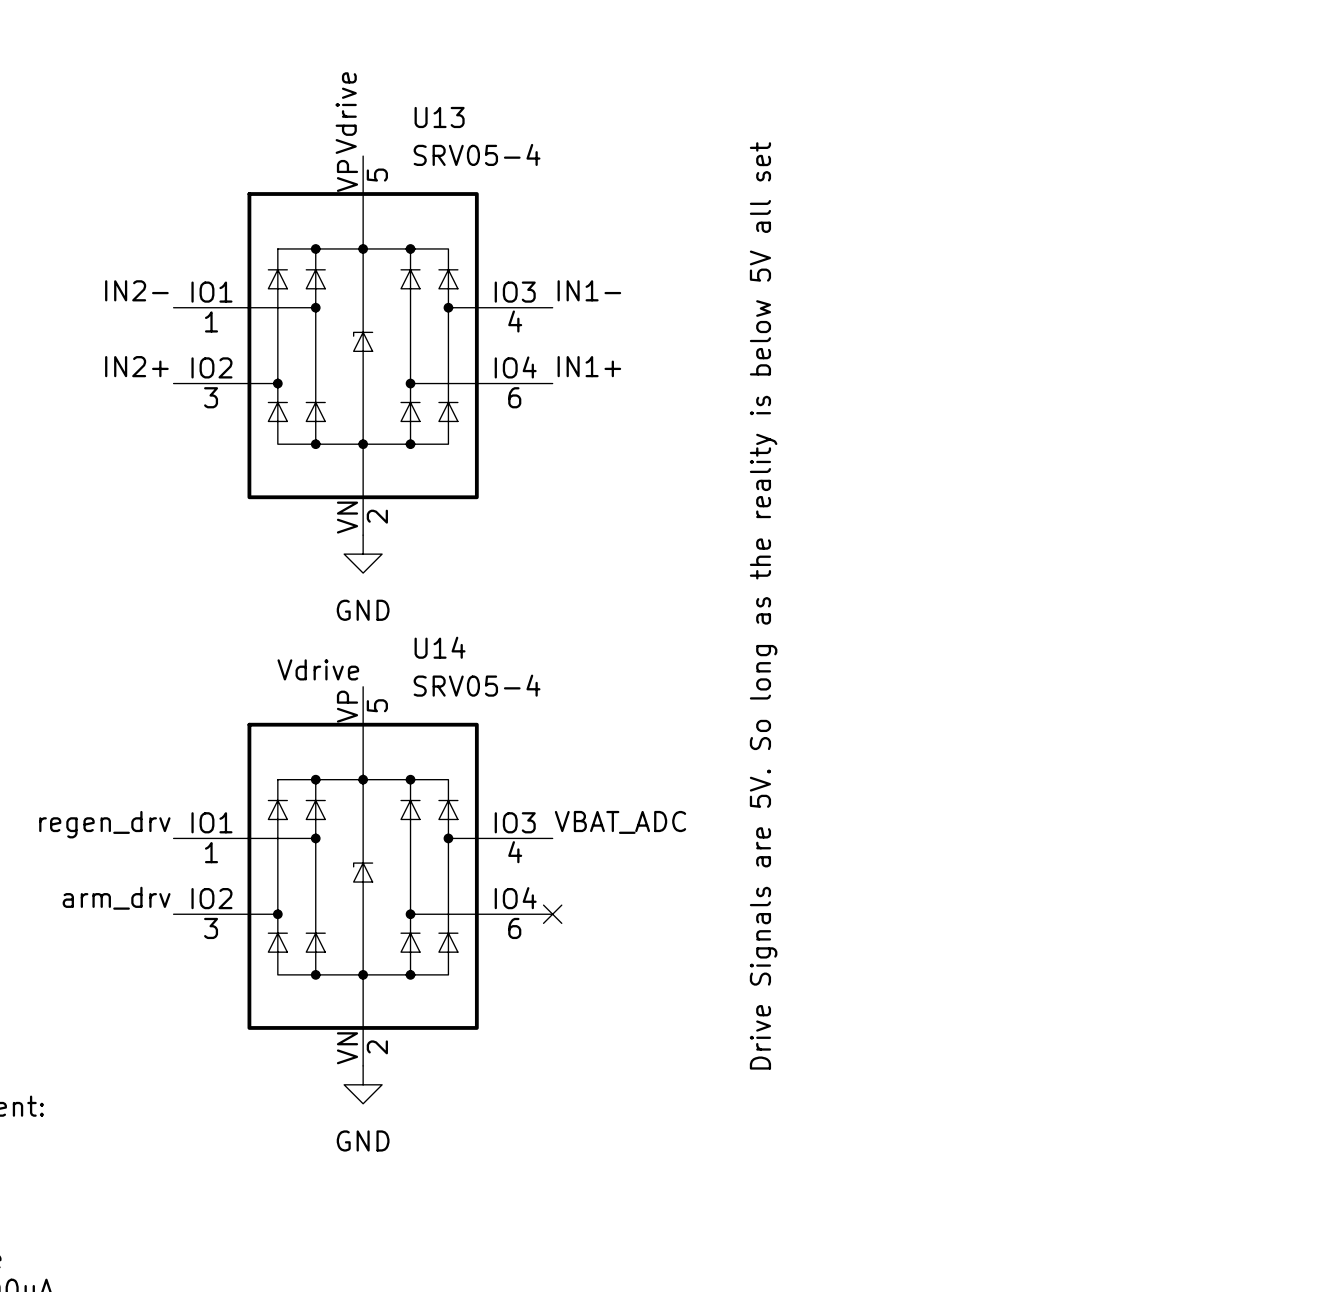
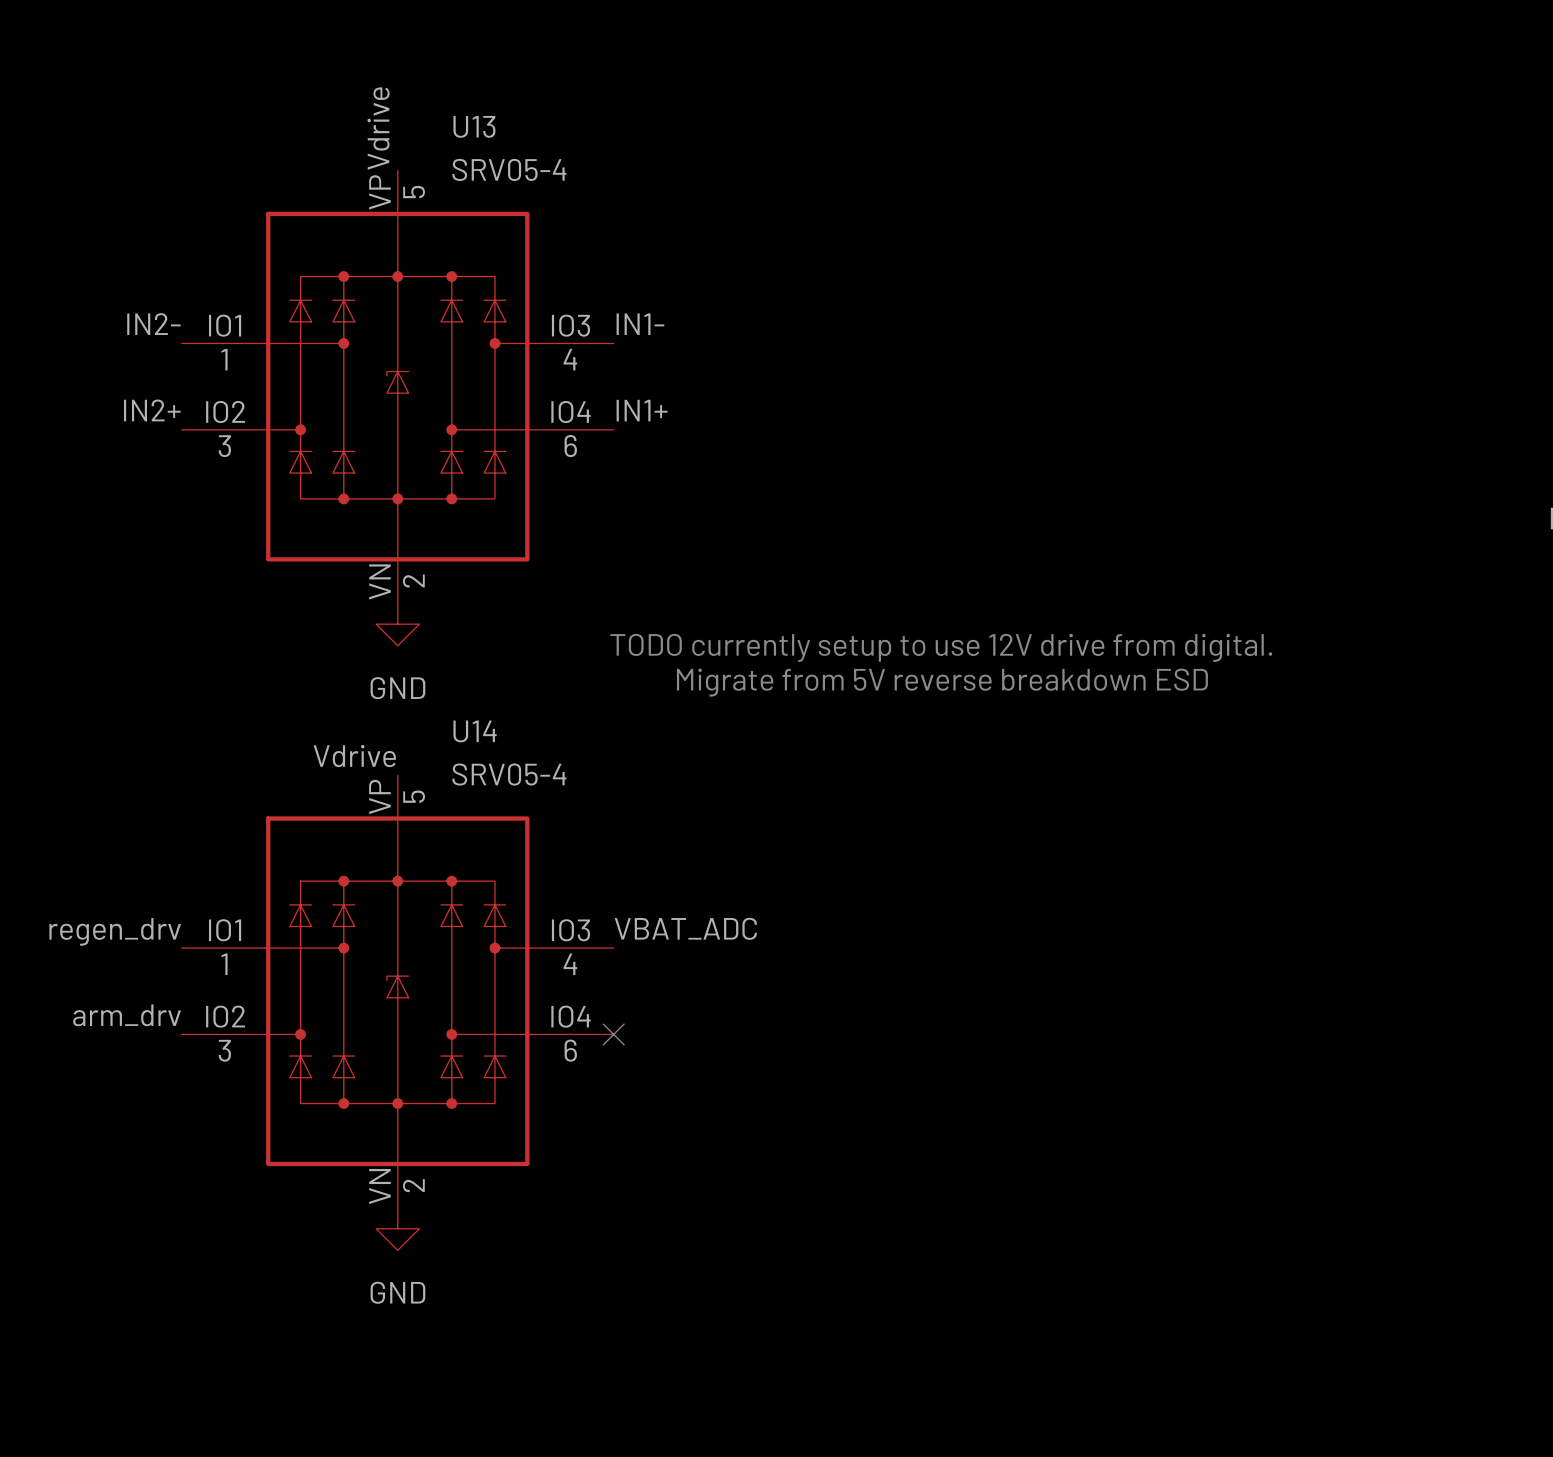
text: none -> TODO currently setup to use 12V drive from digital. (941, 647)
text: Drive Signals are 5V. So long as the reality is below 5V all set (763, 605) -> none
text: none -> Migrate from 5V reverse breakdown ESD (942, 682)

